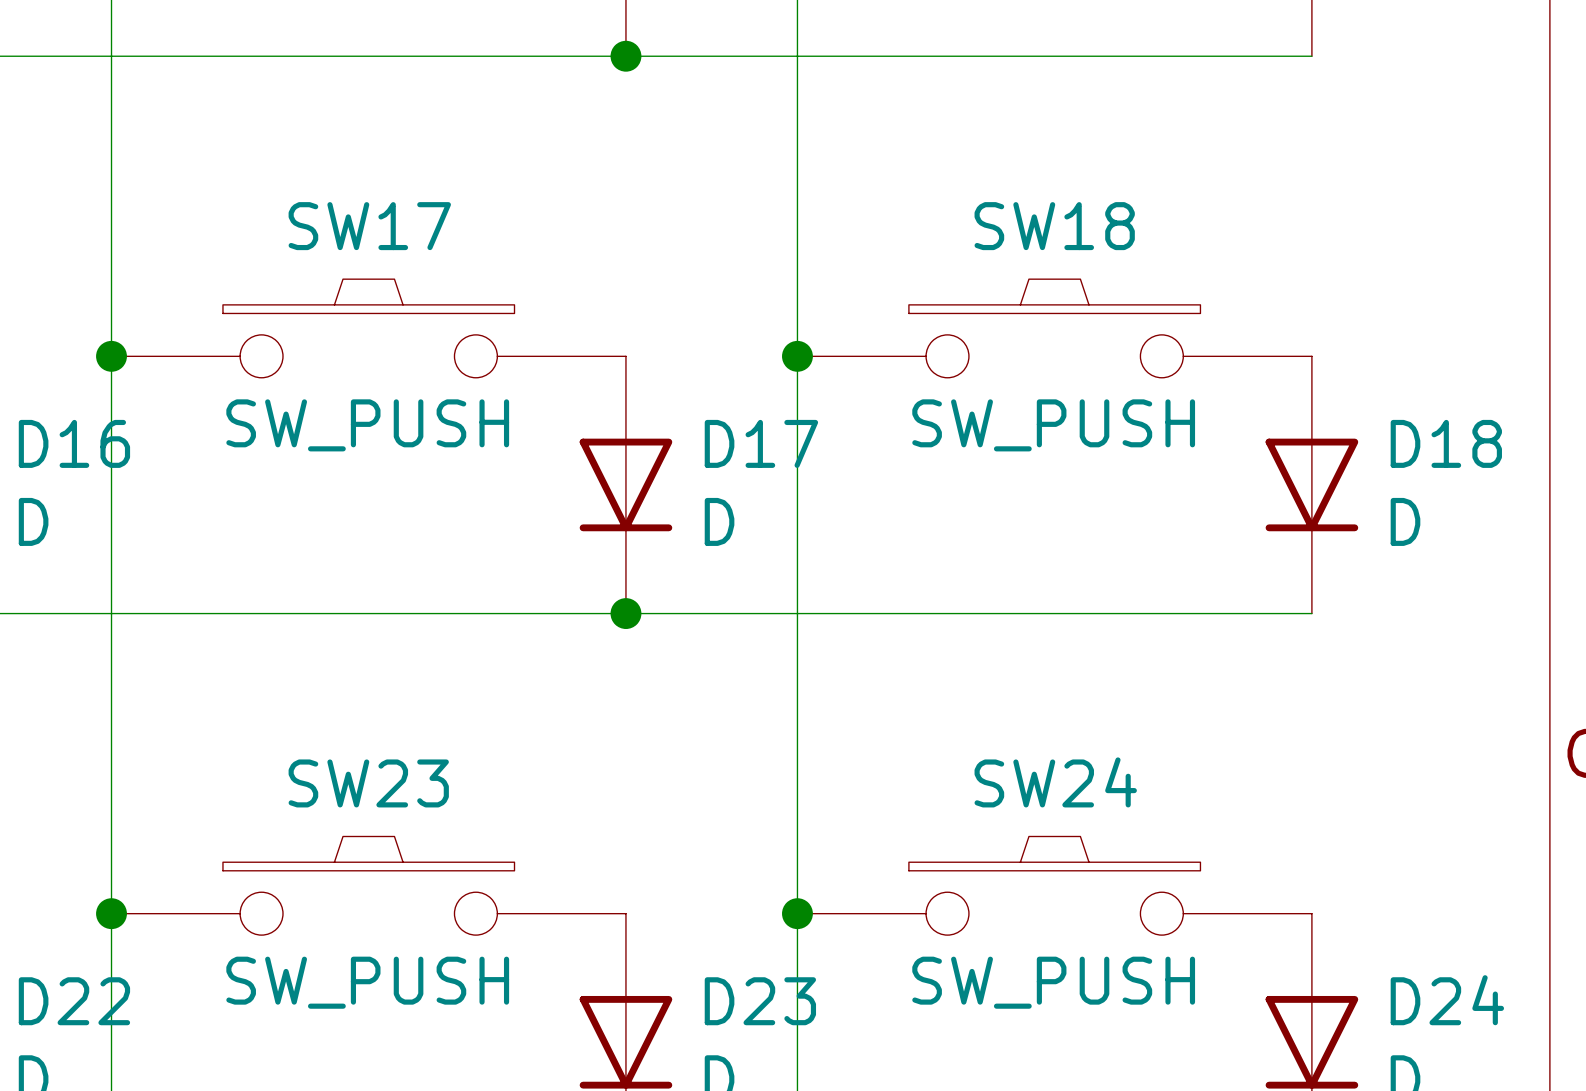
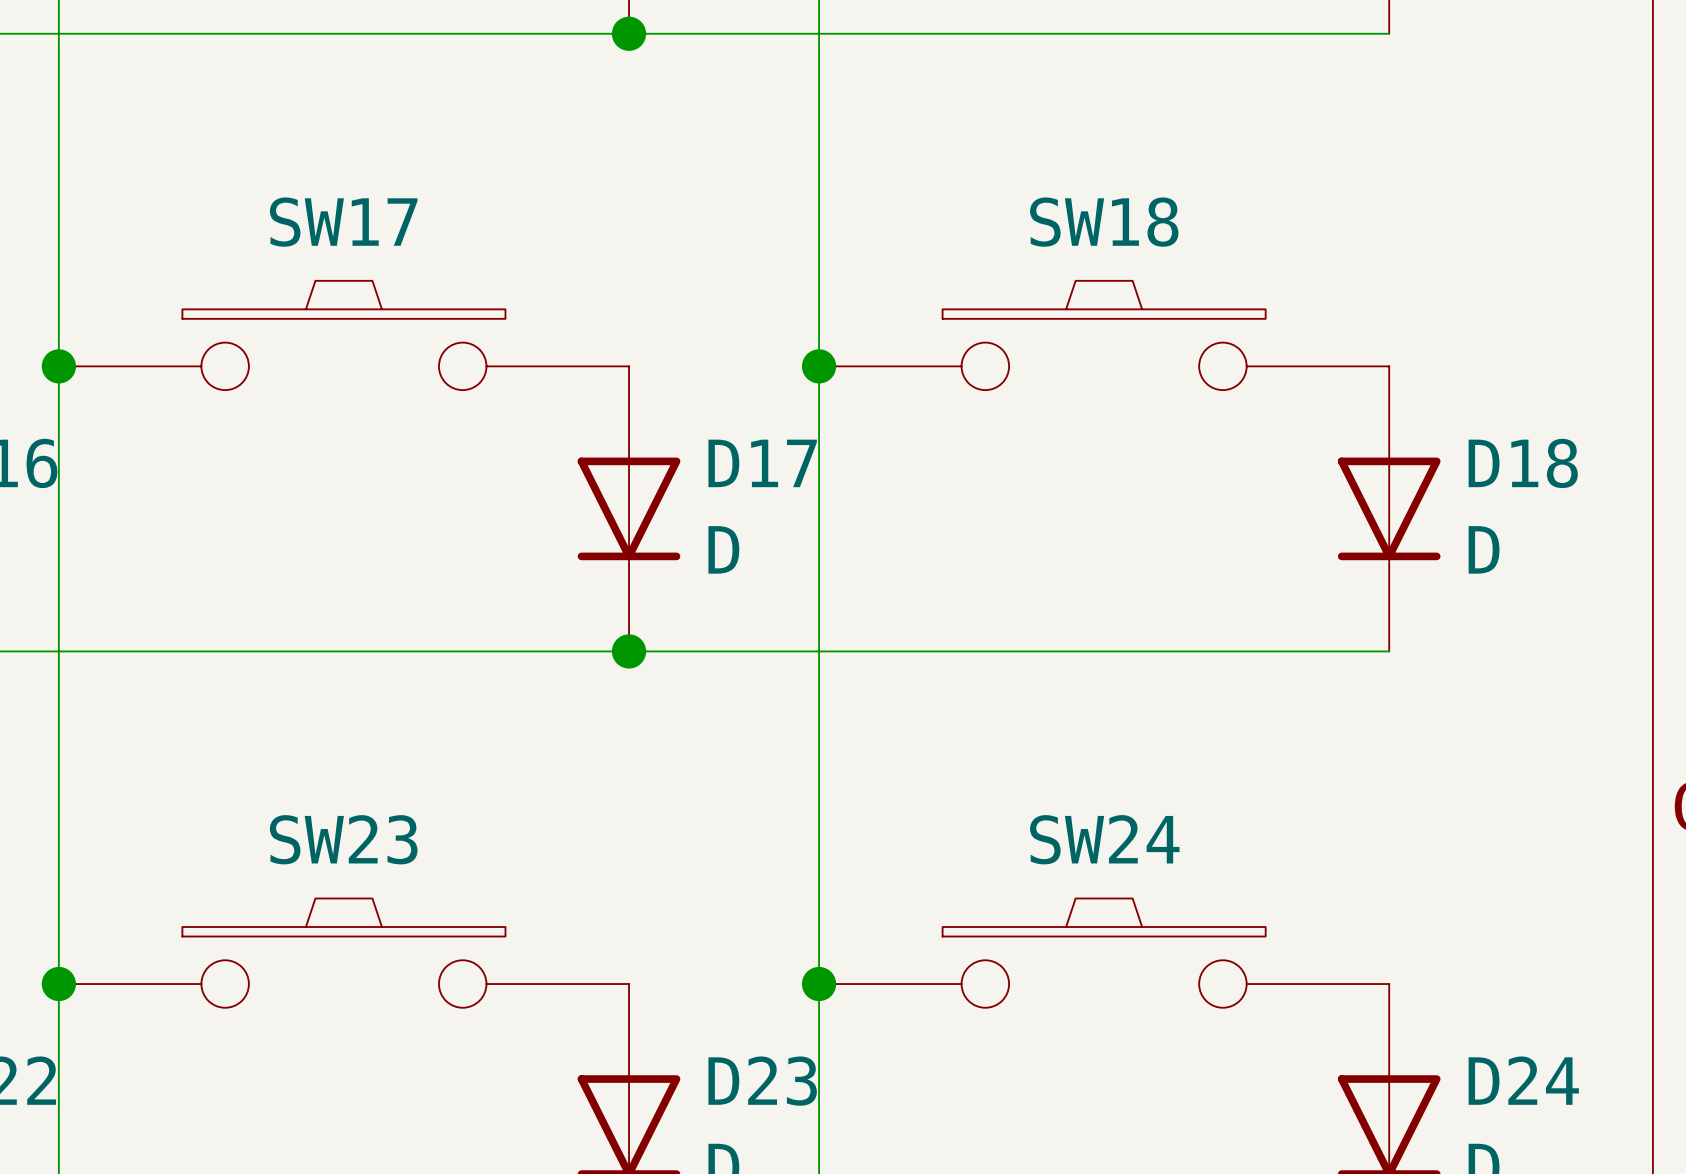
SW17 value: SW_PUSH (367, 425) -> none
SW18 value: SW_PUSH (1053, 425) -> none
SW23 value: SW_PUSH (367, 982) -> none
SW24 value: SW_PUSH (1053, 982) -> none

